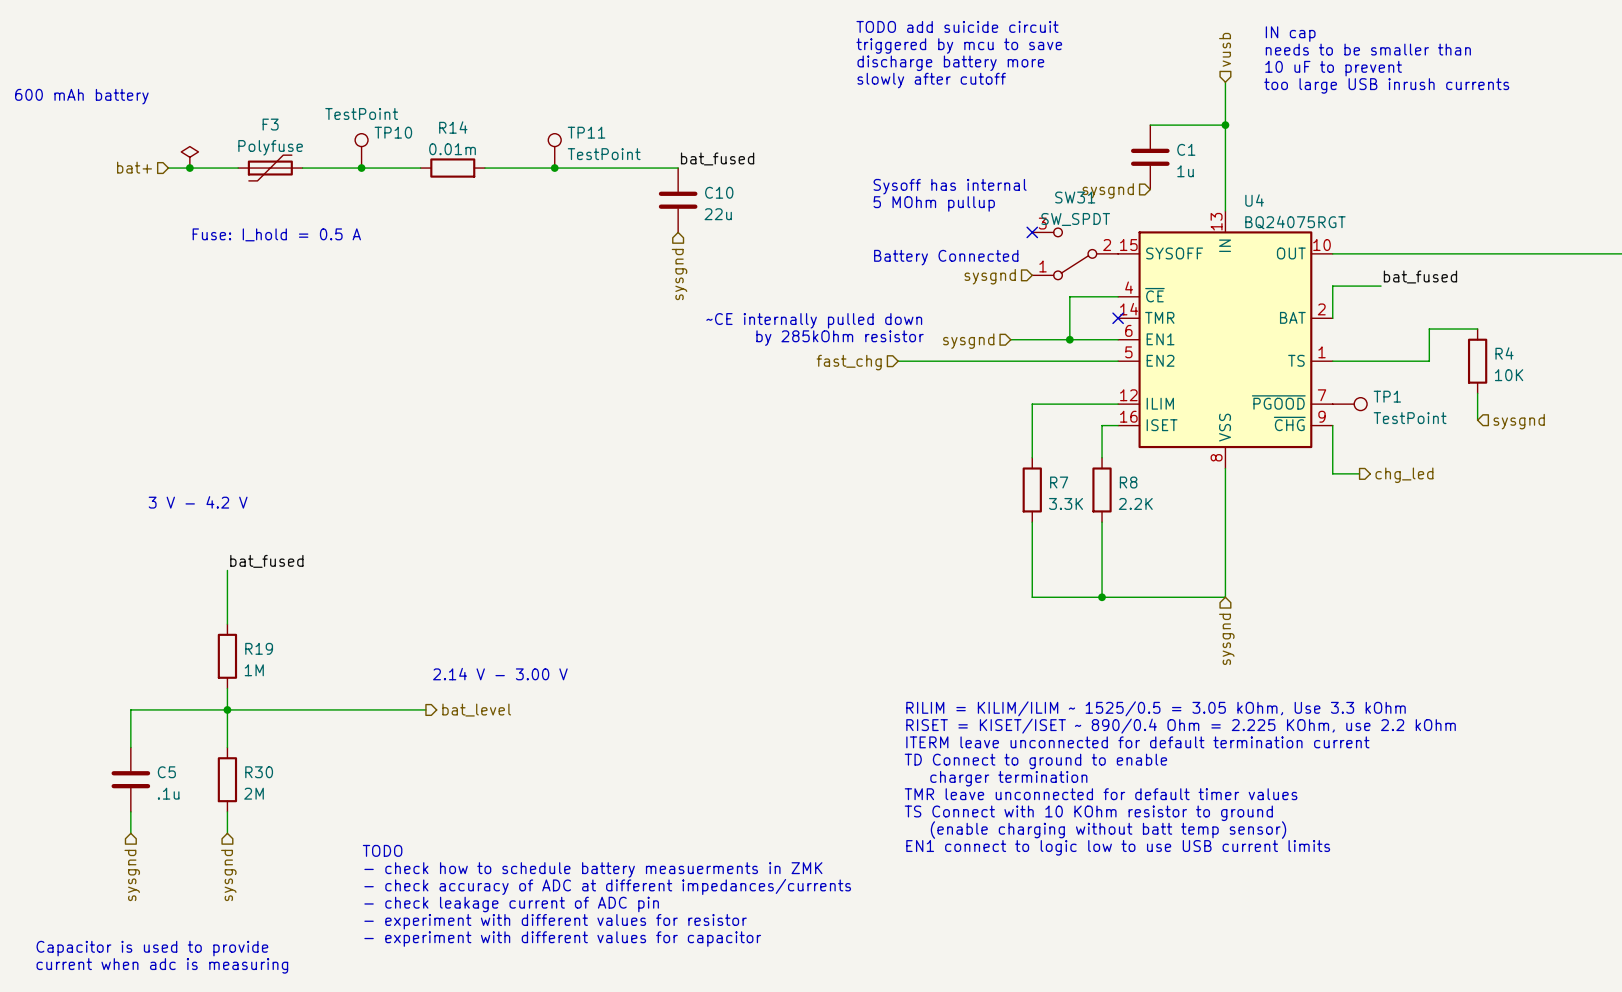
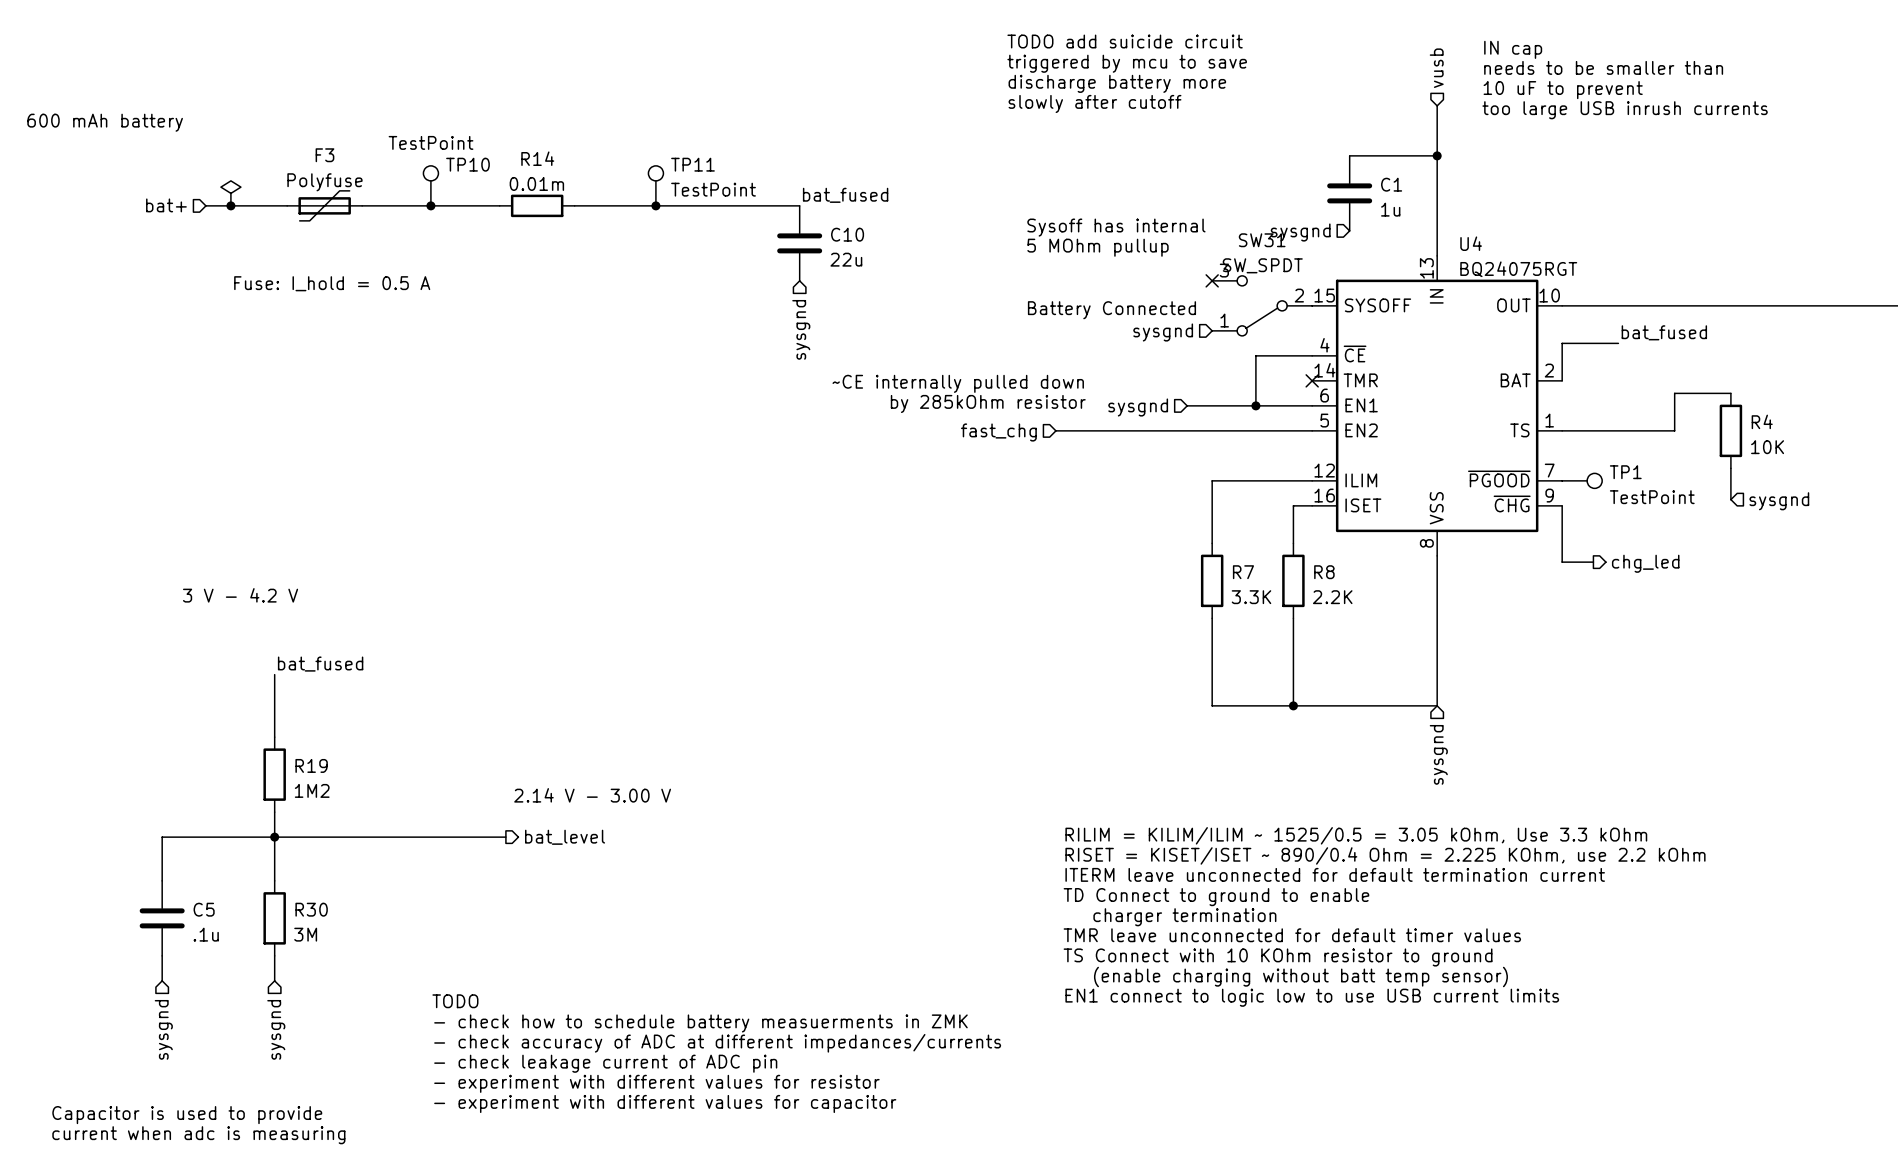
R19 value: 1M (254, 670) -> 1M2 (312, 790)
R30 value: 2M (254, 793) -> 3M (305, 934)

